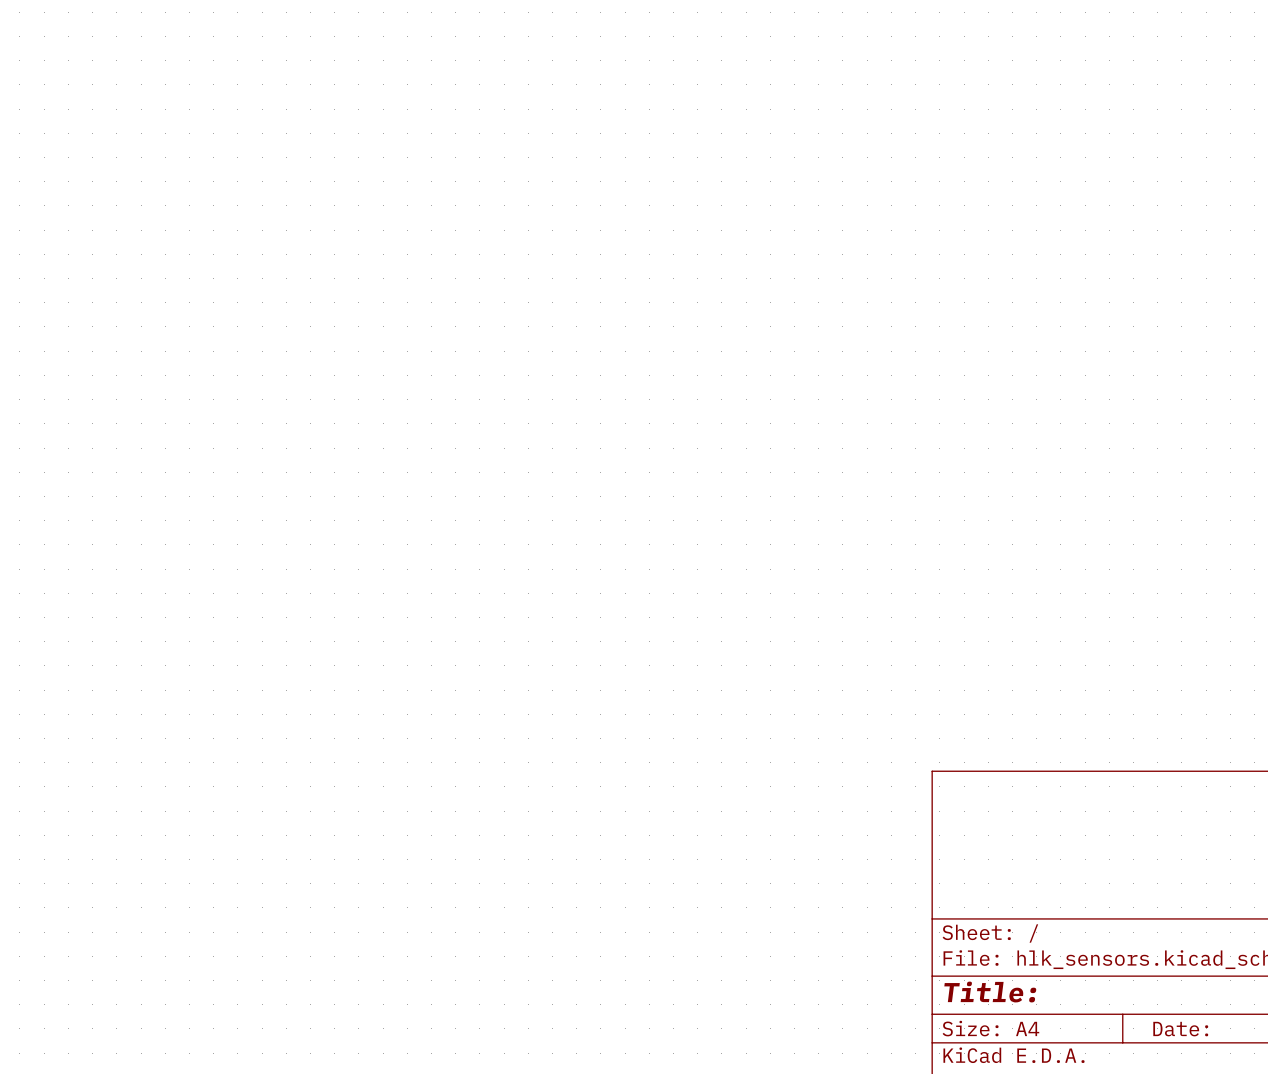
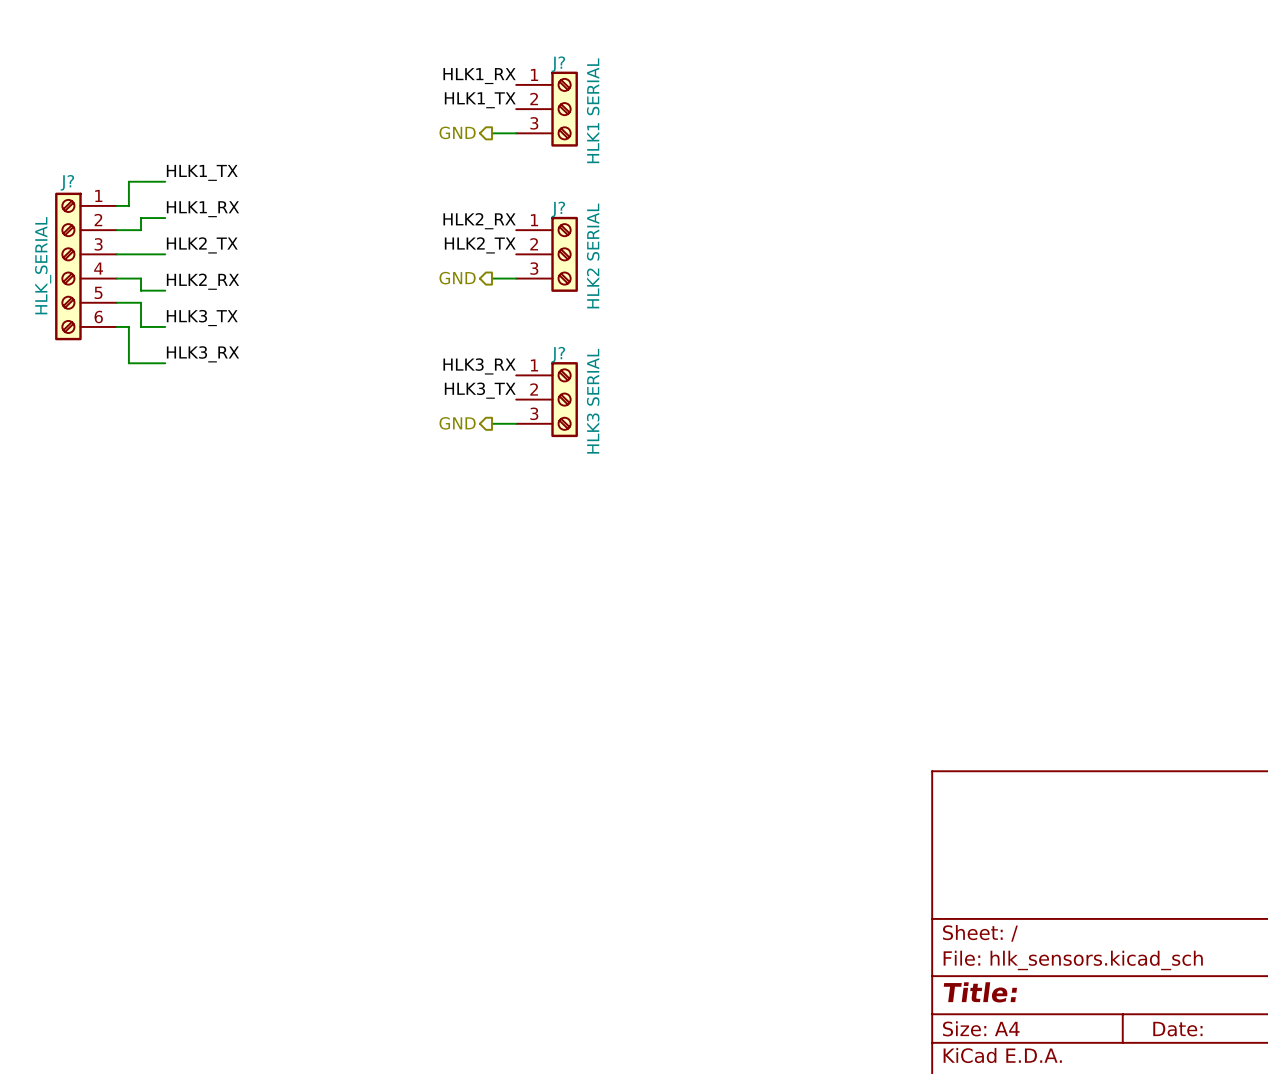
label: none -> HLK1_RX (479, 76)
label: none -> HLK1_TX (480, 100)
J?: none -> HLK1 SERIAL (547, 109)
hierarchical label: none -> GND (457, 132)
wire: none -> (491, 133) (516, 133)
label: none -> HLK1_TX (202, 172)
wire: none -> (165, 181) (128, 181) (128, 205) (116, 205)
label: none -> HLK1_RX (202, 209)
wire: none -> (165, 218) (141, 218) (141, 230) (116, 230)
label: none -> HLK2_RX (479, 221)
label: none -> HLK2_TX (202, 245)
label: none -> HLK2_TX (480, 245)
wire: none -> (116, 254) (165, 254)
J?: none -> HLK2 SERIAL (547, 254)
J?: none -> HLK_SERIAL (85, 266)
wire: none -> (116, 278) (141, 278) (141, 290) (165, 290)
hierarchical label: none -> GND (457, 278)
wire: none -> (491, 278) (516, 278)
label: none -> HLK2_RX (202, 281)
wire: none -> (116, 302) (141, 302) (141, 326) (165, 326)
label: none -> HLK3_TX (202, 318)
wire: none -> (116, 326) (128, 326) (128, 363) (165, 363)
label: none -> HLK3_RX (202, 354)
label: none -> HLK3_RX (479, 366)
label: none -> HLK3_TX (480, 390)
J?: none -> HLK3 SERIAL (547, 399)
hierarchical label: none -> GND (457, 423)
wire: none -> (491, 423) (516, 423)

